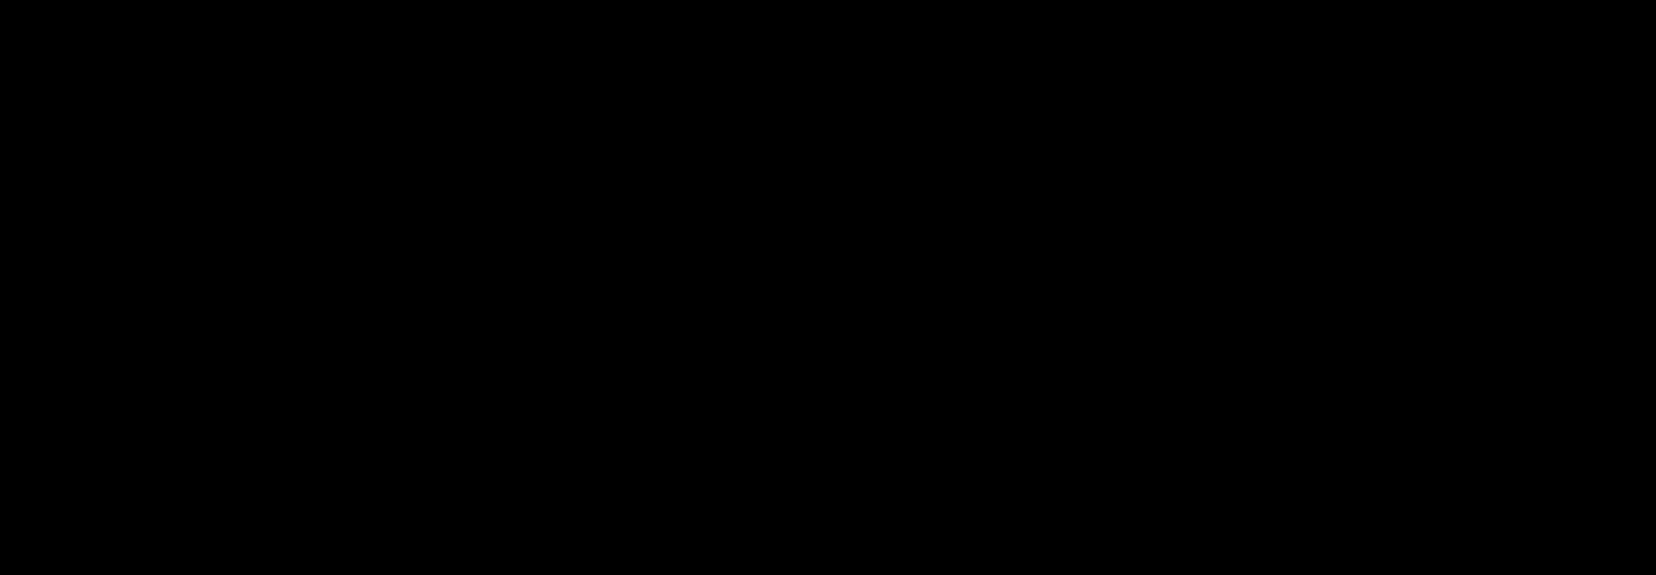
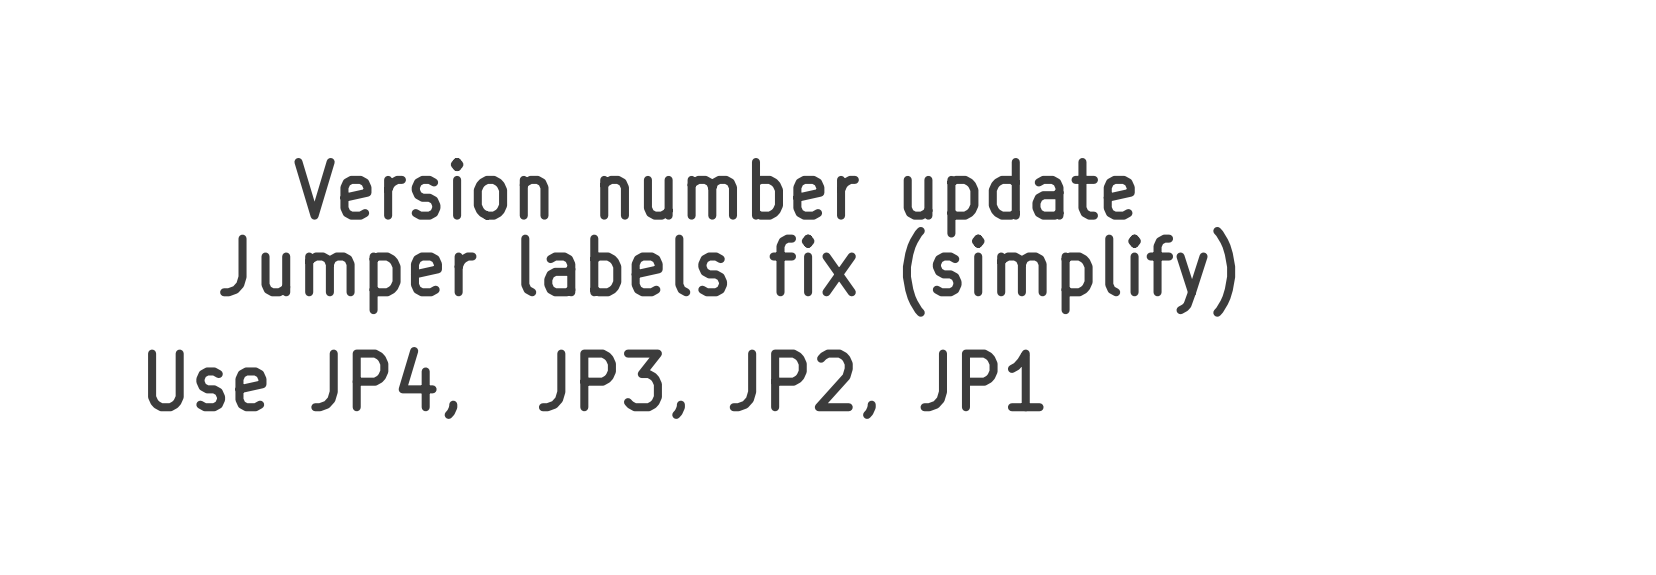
text: none -> Version number update (714, 197)
text: none -> Jumper labels fix (simplify) (727, 271)
text: none -> Use JP4, JP3, JP2, JP1 (595, 382)

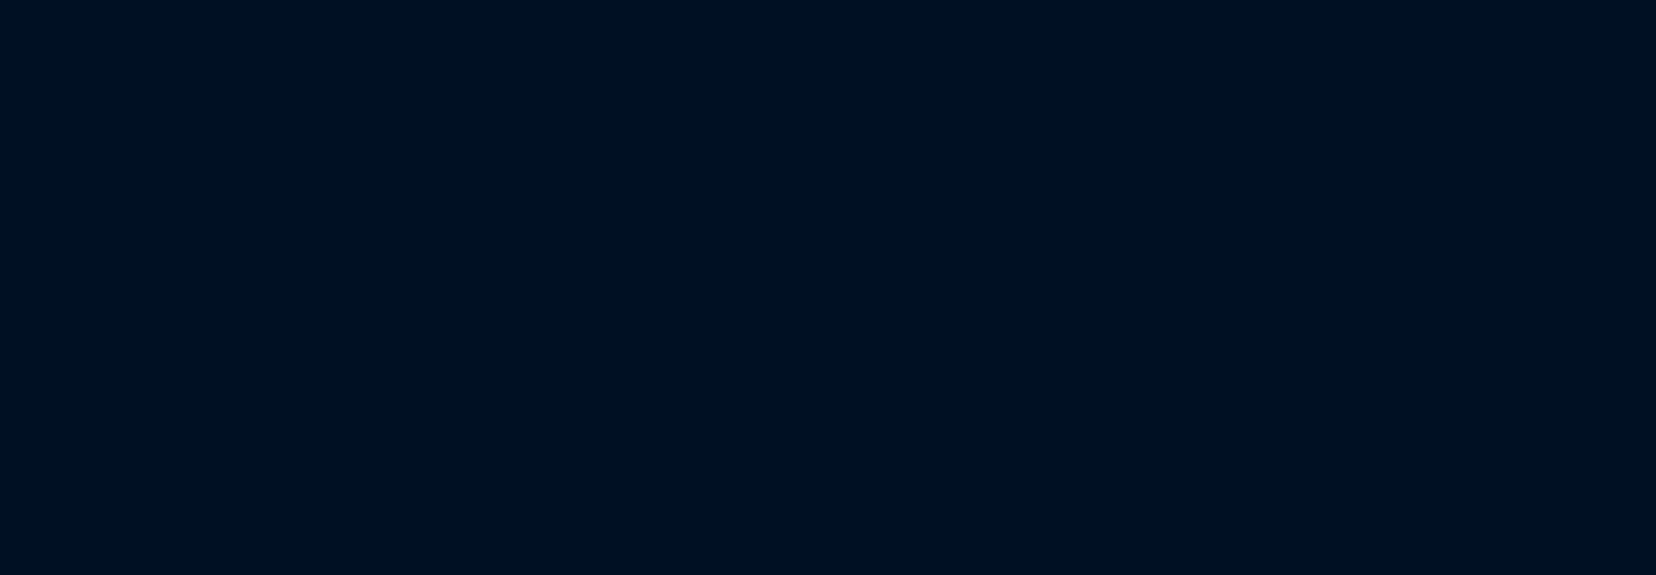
text: Version number update (714, 197) -> none
text: Jumper labels fix (simplify) (727, 271) -> none
text: Use JP4, JP3, JP2, JP1 (595, 382) -> none

